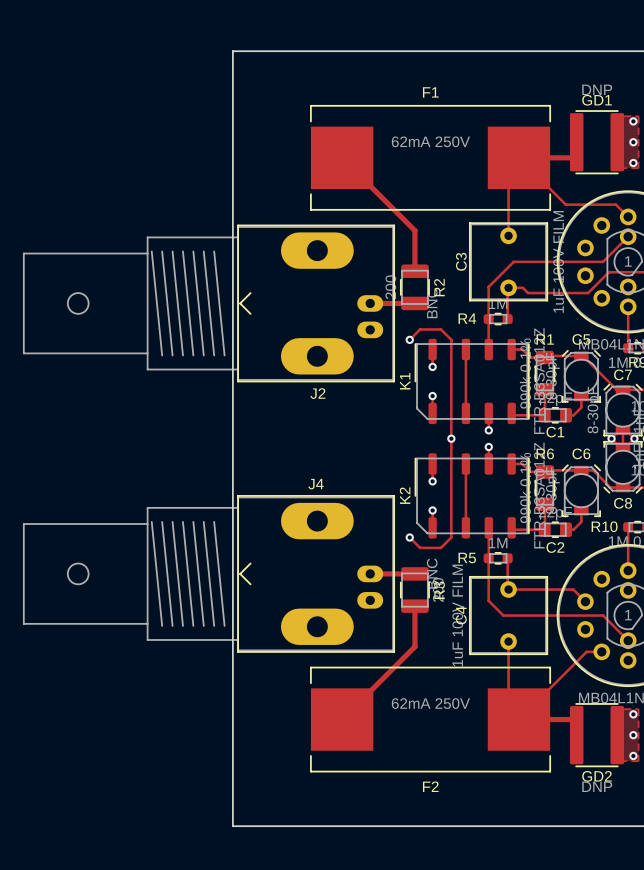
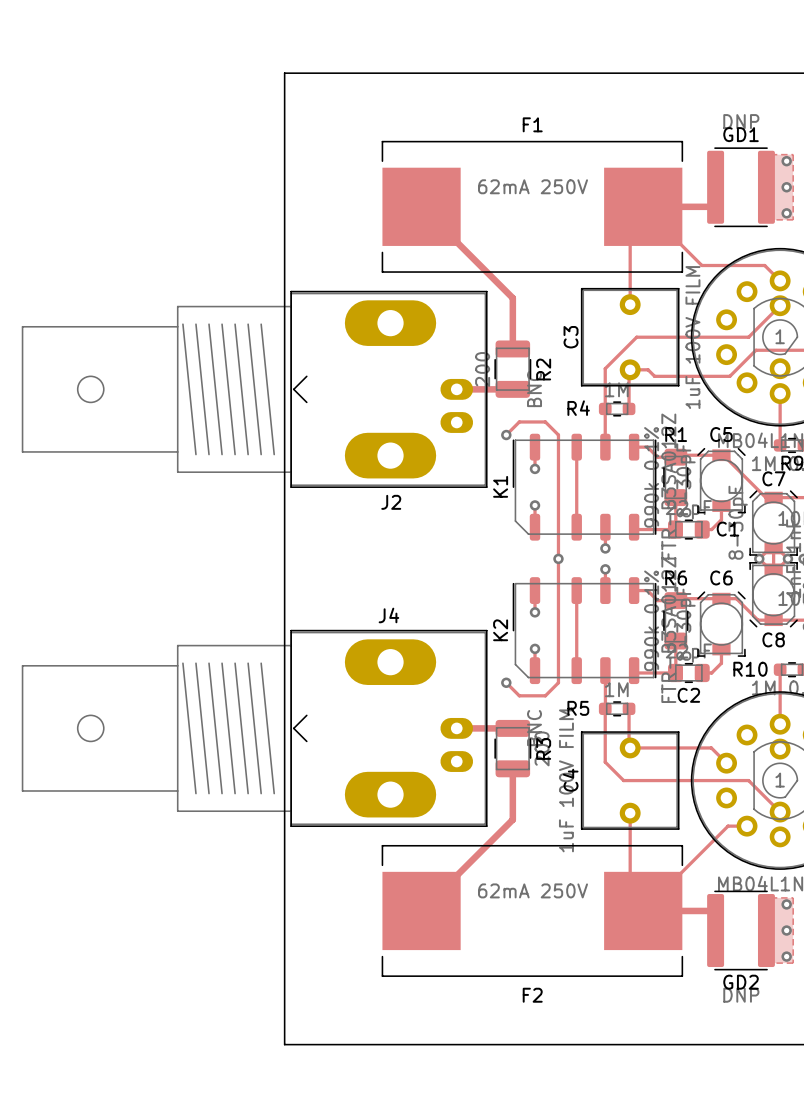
C1 name position: C1 (555, 432) -> C1 (727, 529)

